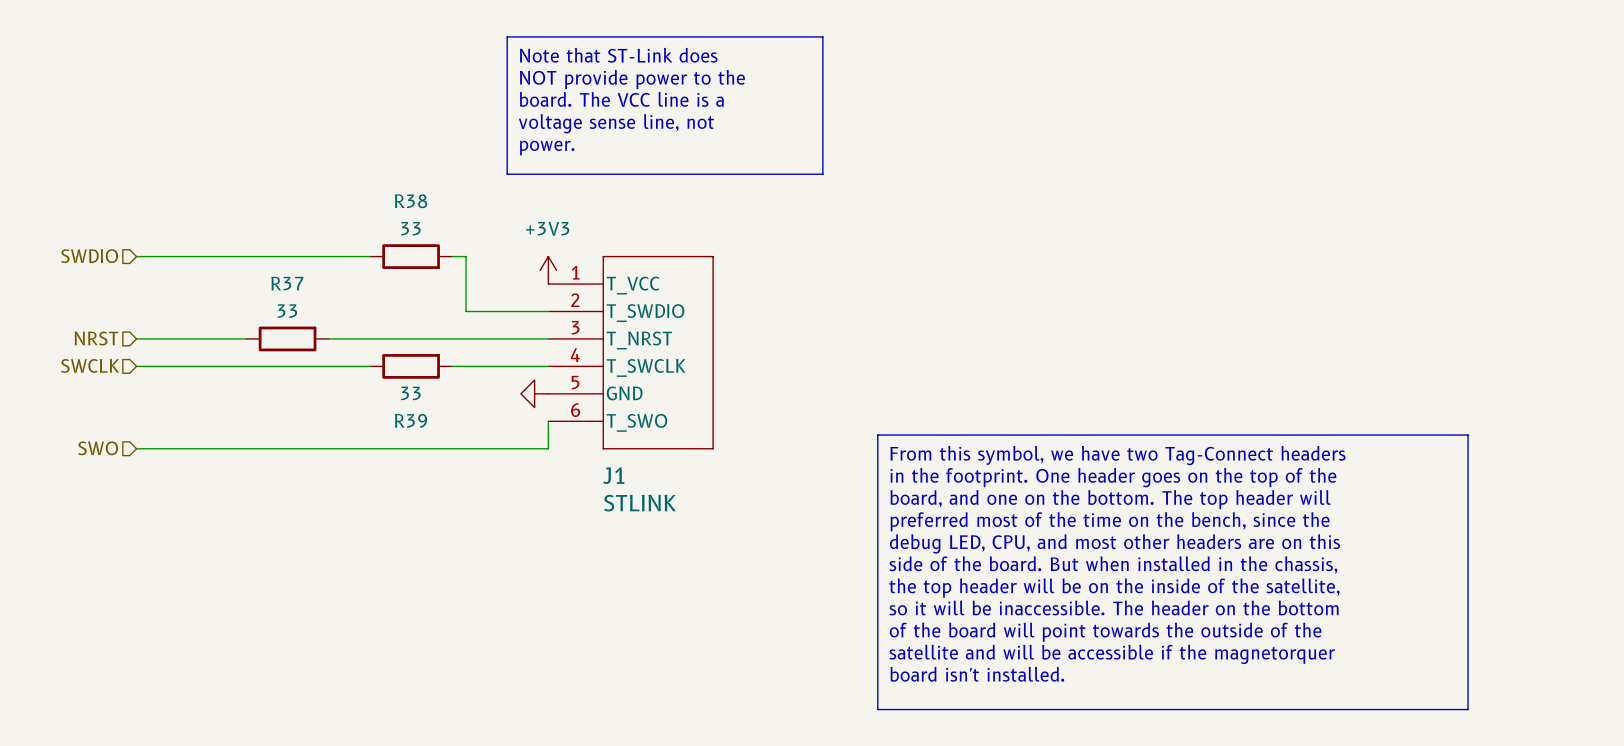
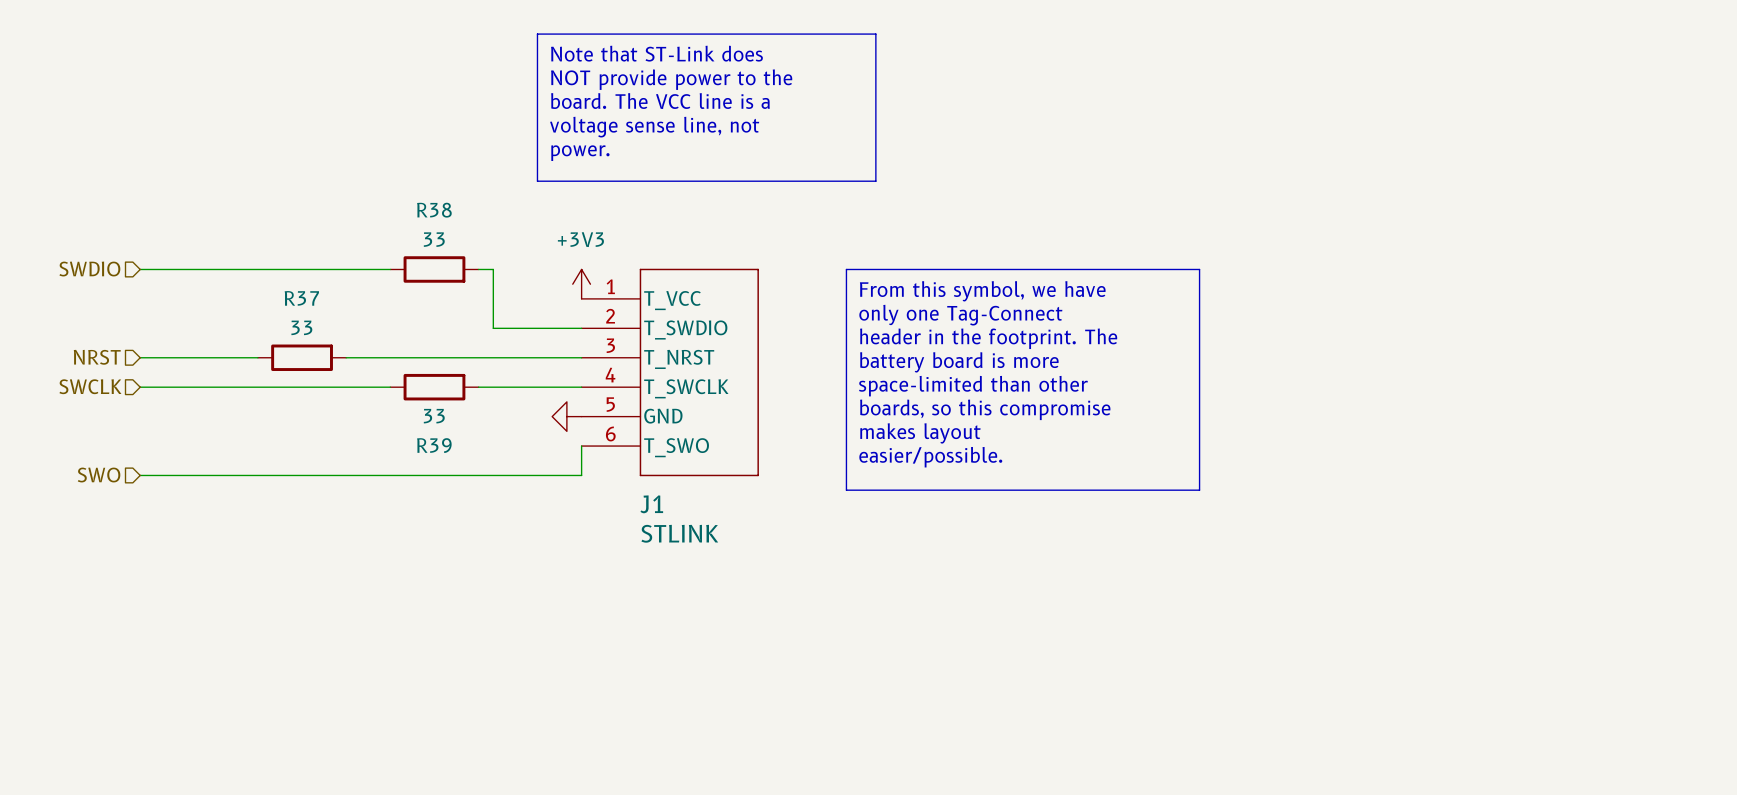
line: none -> (846, 269) (1199, 269) (1199, 490) (846, 490) (846, 269)
text: none -> From this symbol, we have (982, 291)
text: none -> only one Tag-Connect (960, 315)
text: none -> header in the footprint. The (988, 338)
text: none -> battery board is more (959, 362)
text: none -> space-limited than other (973, 386)
text: none -> boards, so this compromise (985, 409)
text: none -> makes layout (920, 433)
text: none -> easier/possible. (930, 457)
line: (877, 435) (1468, 435) (1468, 709) (877, 709) (877, 435) -> none
text: From this symbol, we have two Tag-Connect headers (1117, 455) -> none
text: in the footprint. One header goes on the top of the (1113, 477) -> none
text: board, and one on the bottom. The top header will (1110, 499) -> none
text: preferred most of the time on the bench, since the (1110, 521) -> none
text: debug LED, CPU, and most other headers are on this (1114, 543) -> none
text: side of the board. But when installed in the chassis, (1113, 565) -> none
text: the top header will be on the inside of the satellite, (1114, 588) -> none
text: so it will be inaccessible. The header on the bottom (1114, 607) -> none
text: of the board will point towards the outside of the (1105, 632) -> none
text: satellite and will be accessible if the magnetorquer (1112, 654) -> none
text: board isn't installed. (977, 674) -> none

